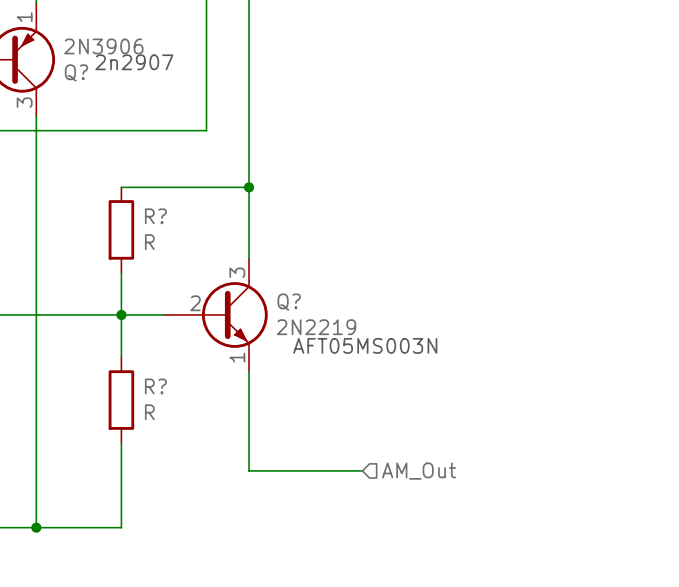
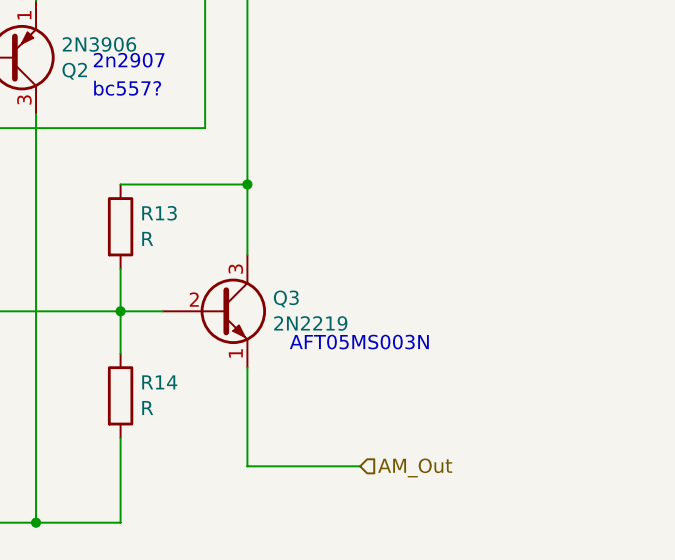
Q? name: Q? (76, 72) -> Q2 (74, 71)
text: none -> bc557? (127, 88)
R? name: R? (155, 216) -> R13 (159, 213)
Q? name: Q? (289, 302) -> Q3 (286, 298)
R? name: R? (155, 386) -> R14 (159, 382)

